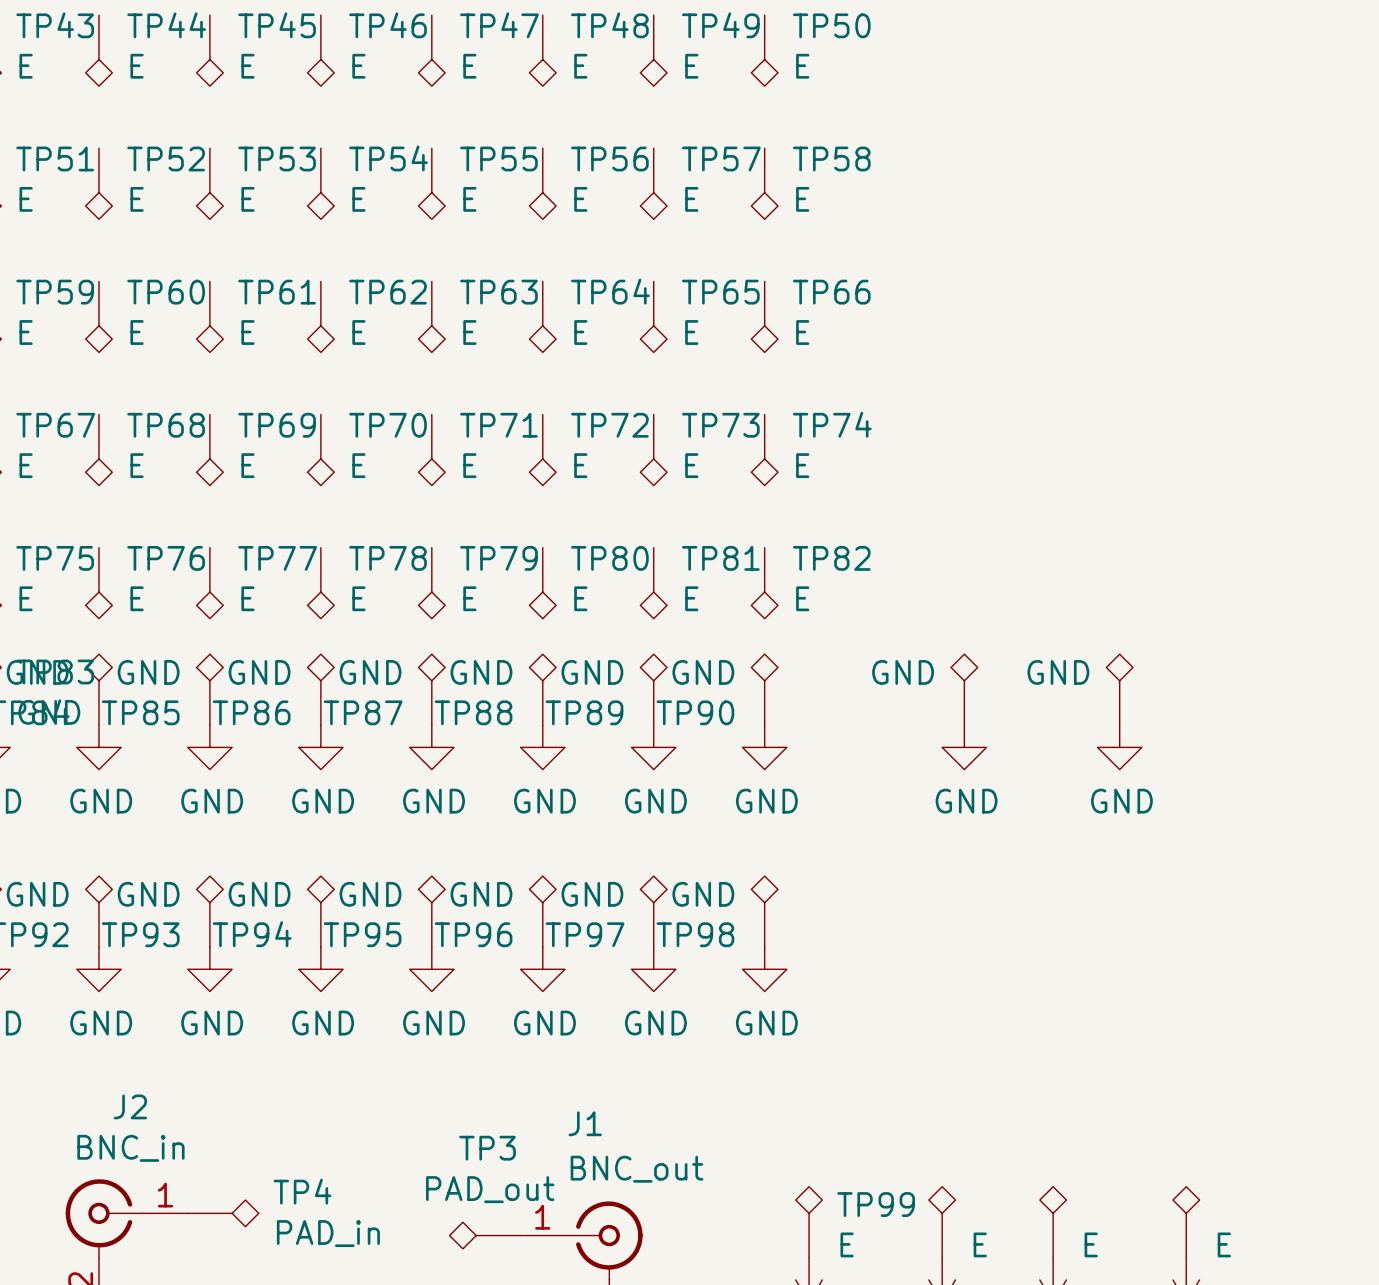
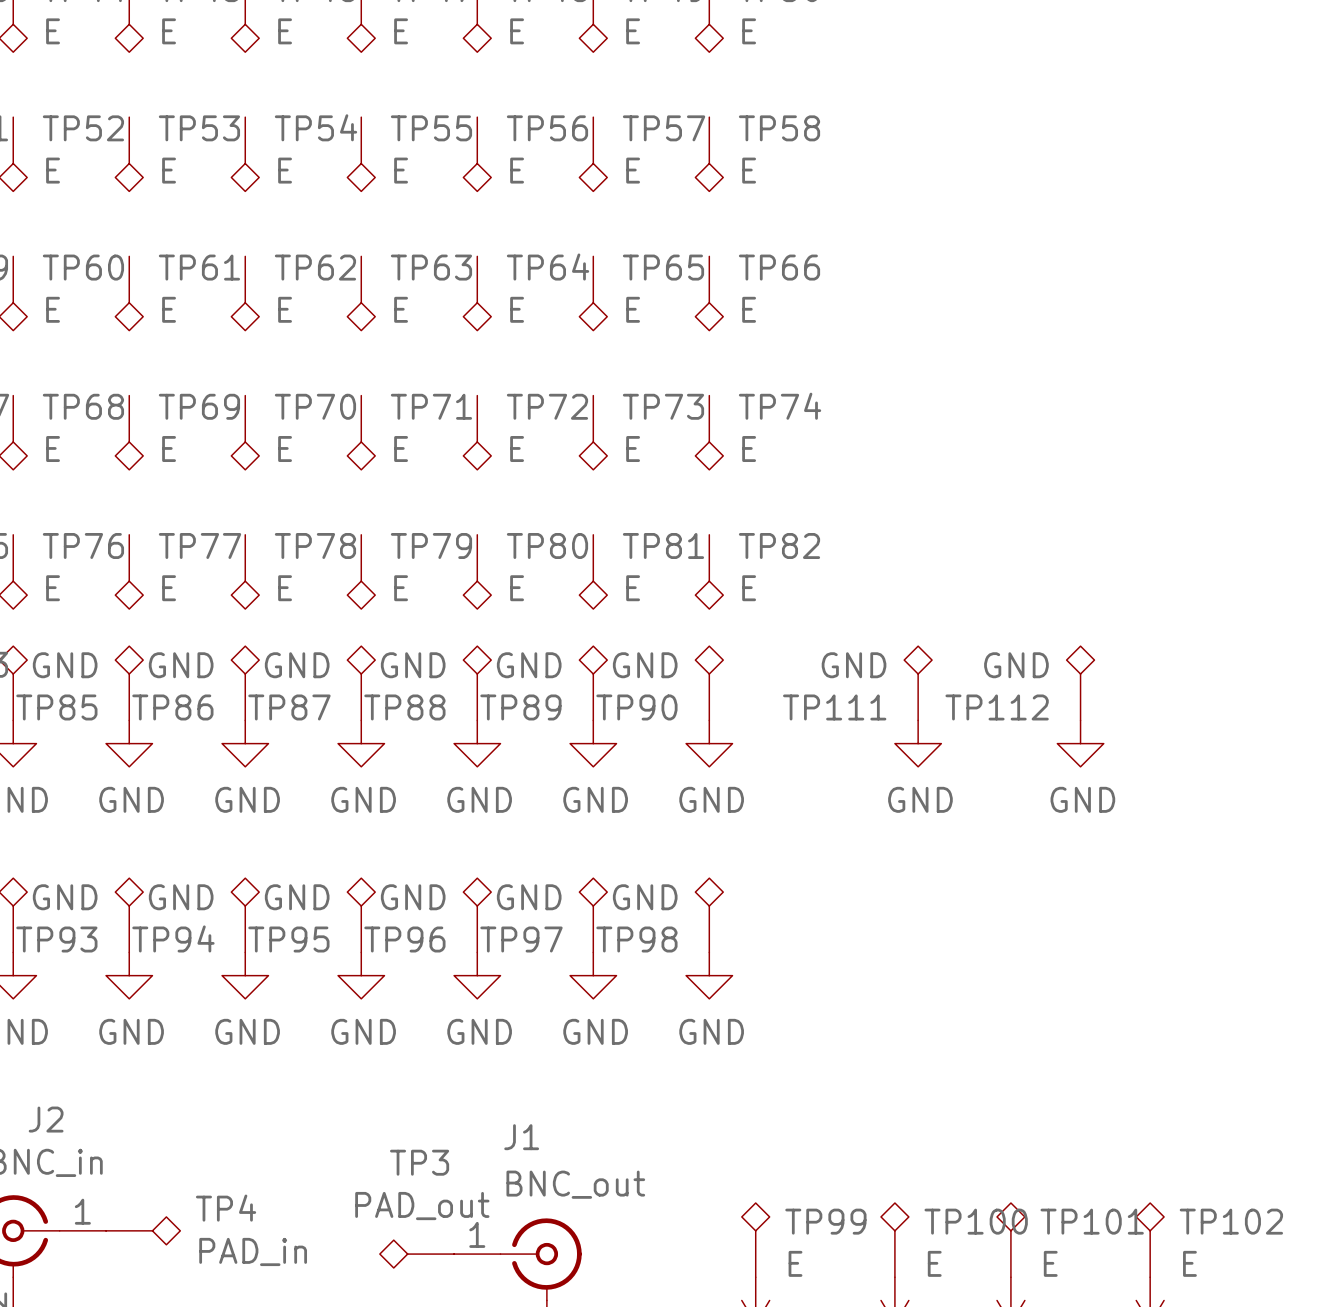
TP111 name: none -> TP111 (834, 707)
TP112 name: none -> TP112 (997, 707)
TP100 name: none -> TP100 (976, 1221)
TP101 name: none -> TP101 (1092, 1221)
TP102 name: none -> TP102 (1231, 1221)

